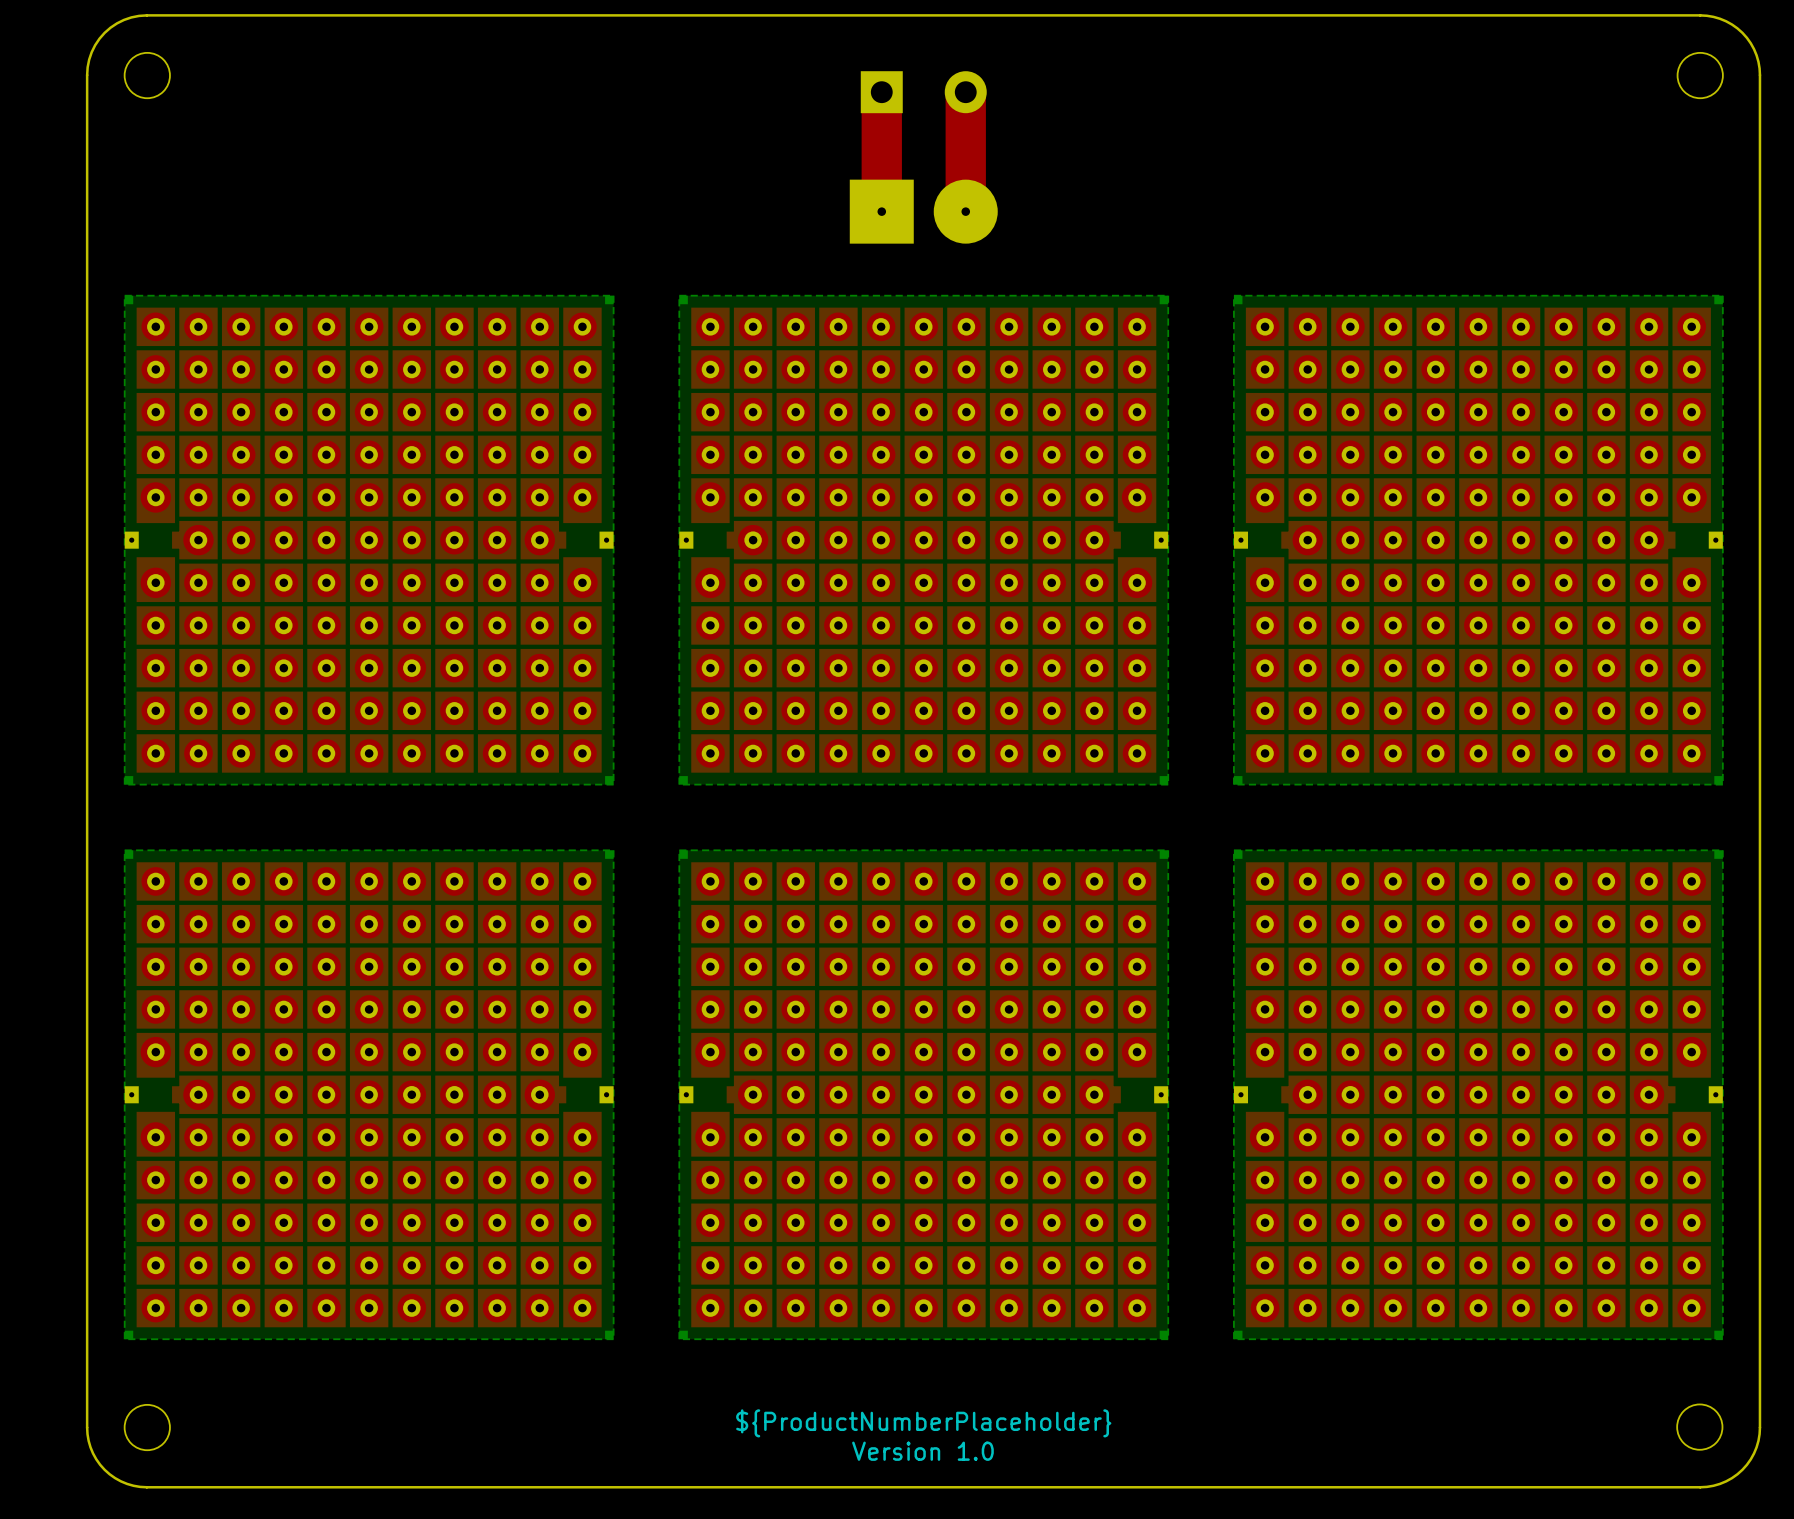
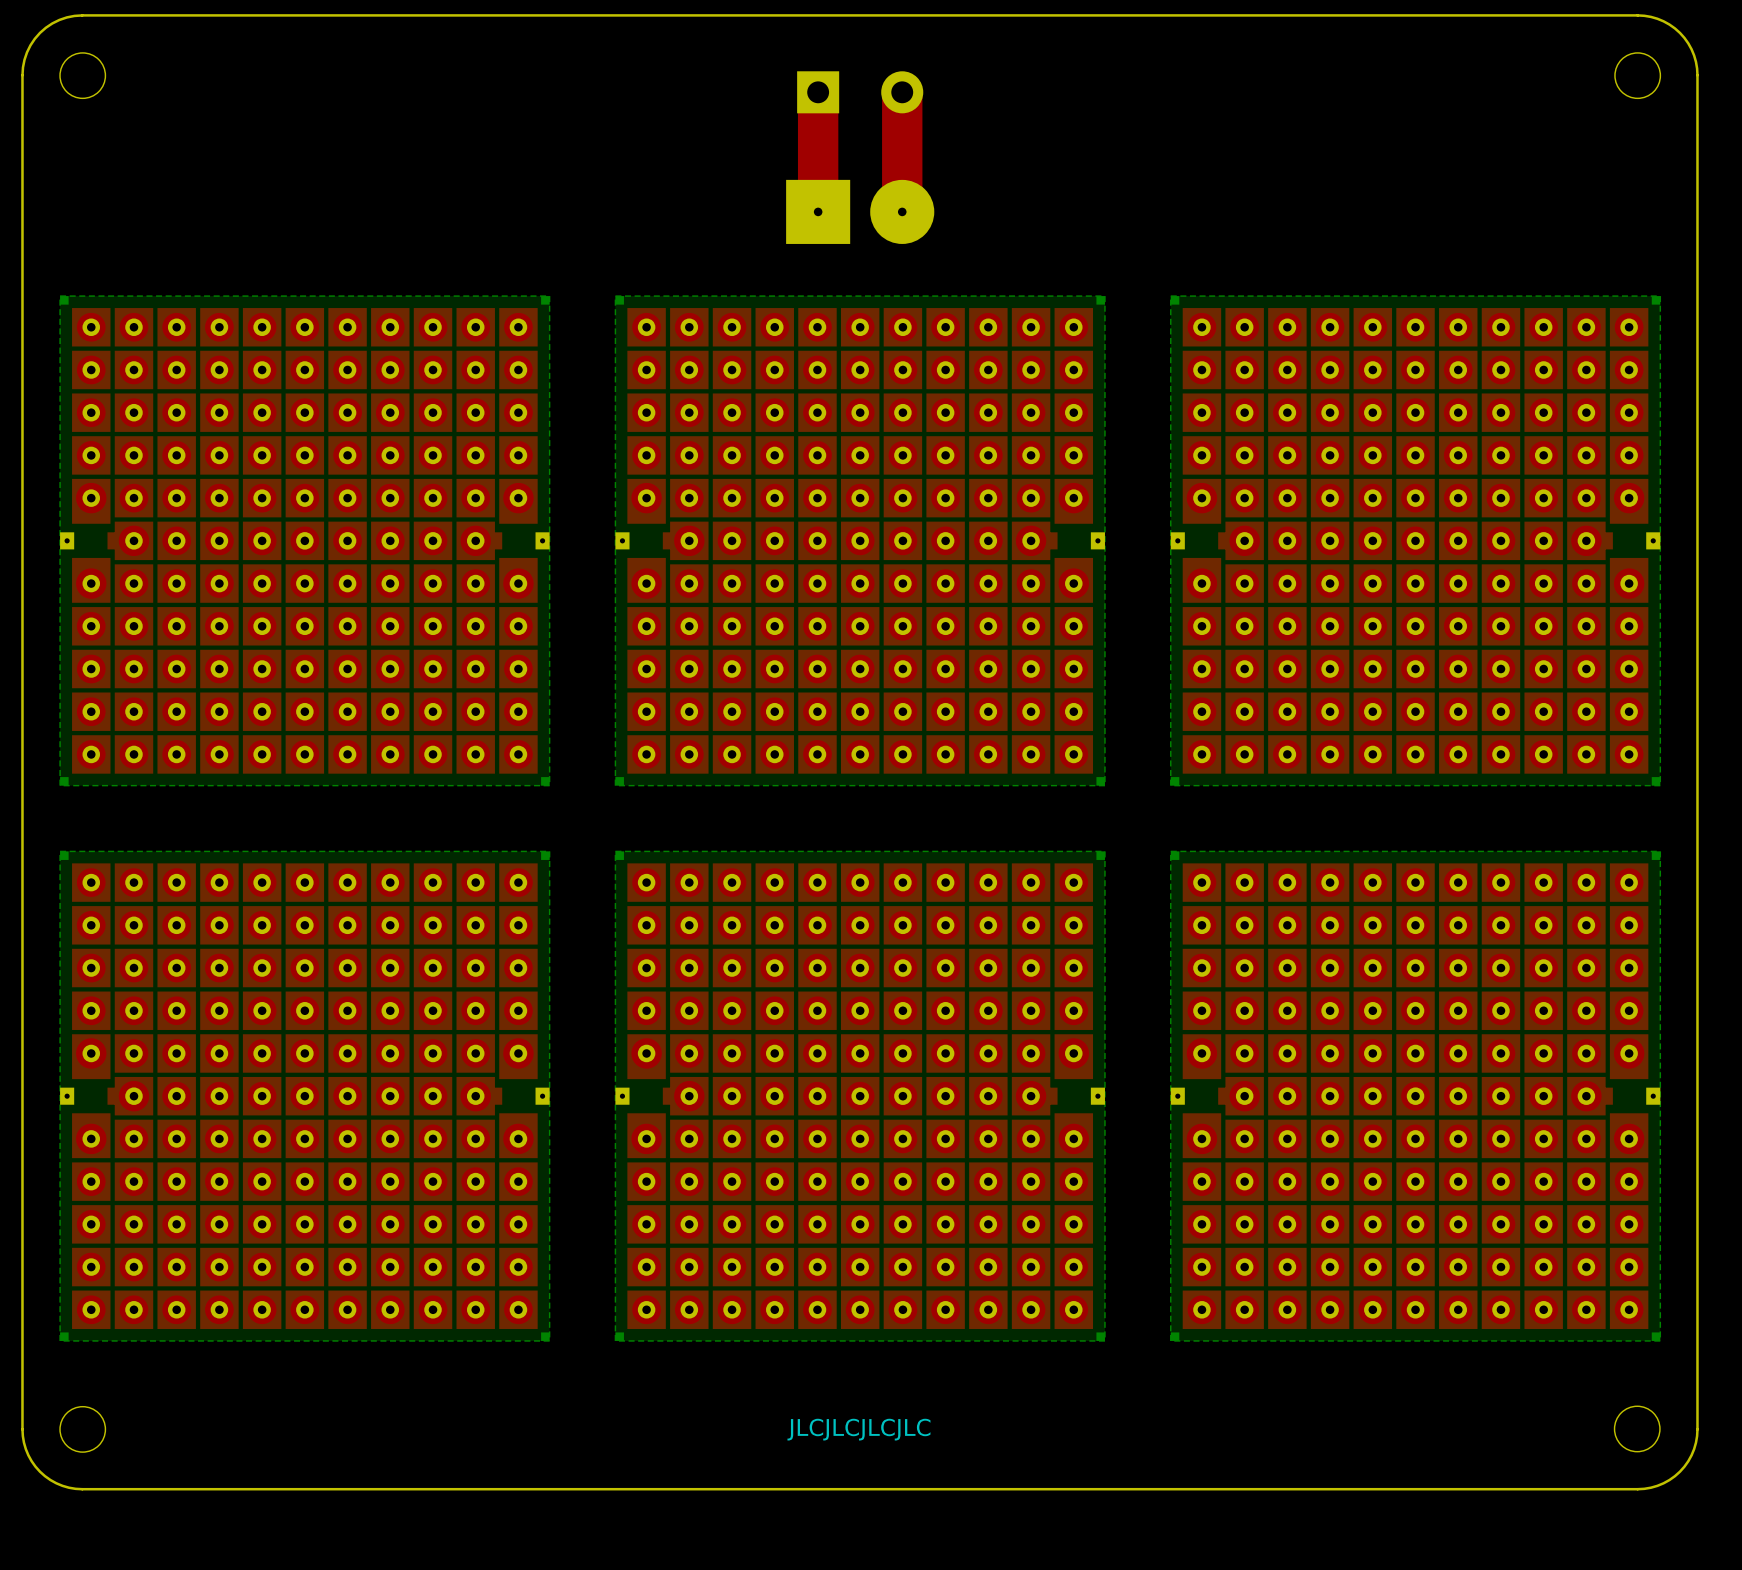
text: ${ProductNumberPlaceholder} (923, 1423) -> JLCJLCJLCJLC (858, 1429)
text: Version 1.0 (922, 1451) -> none

